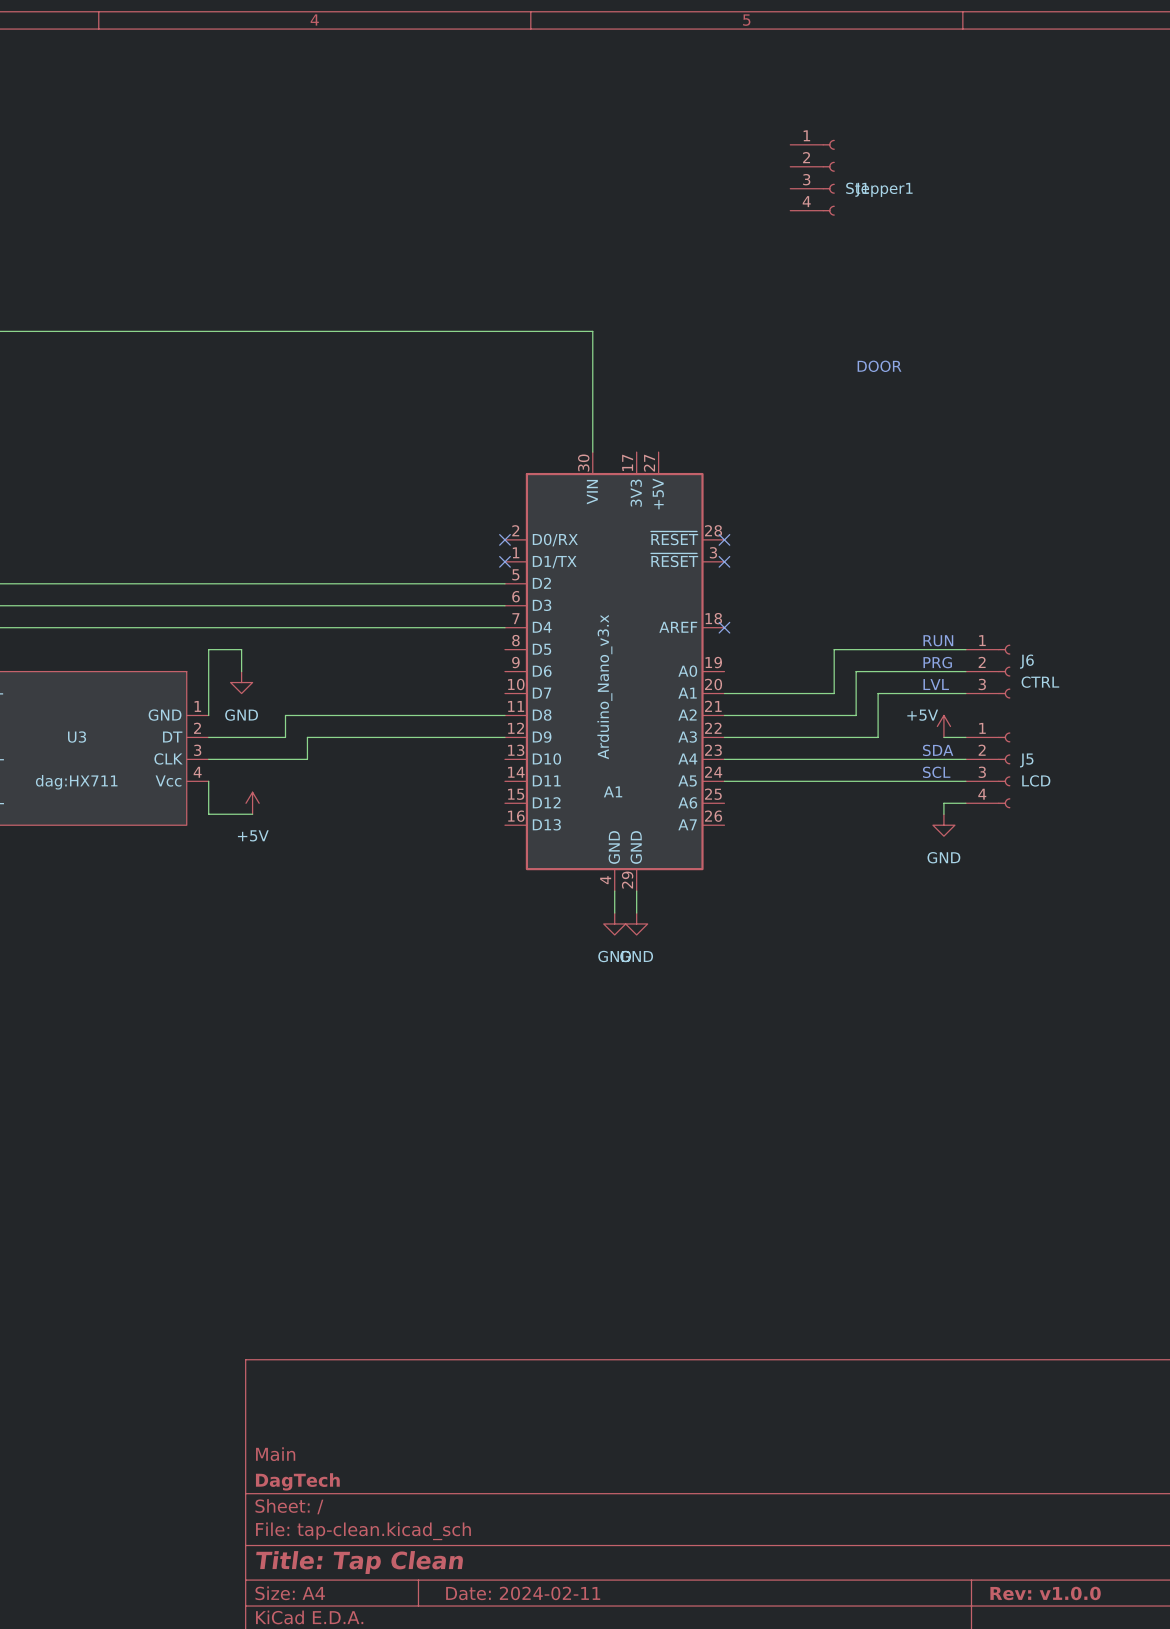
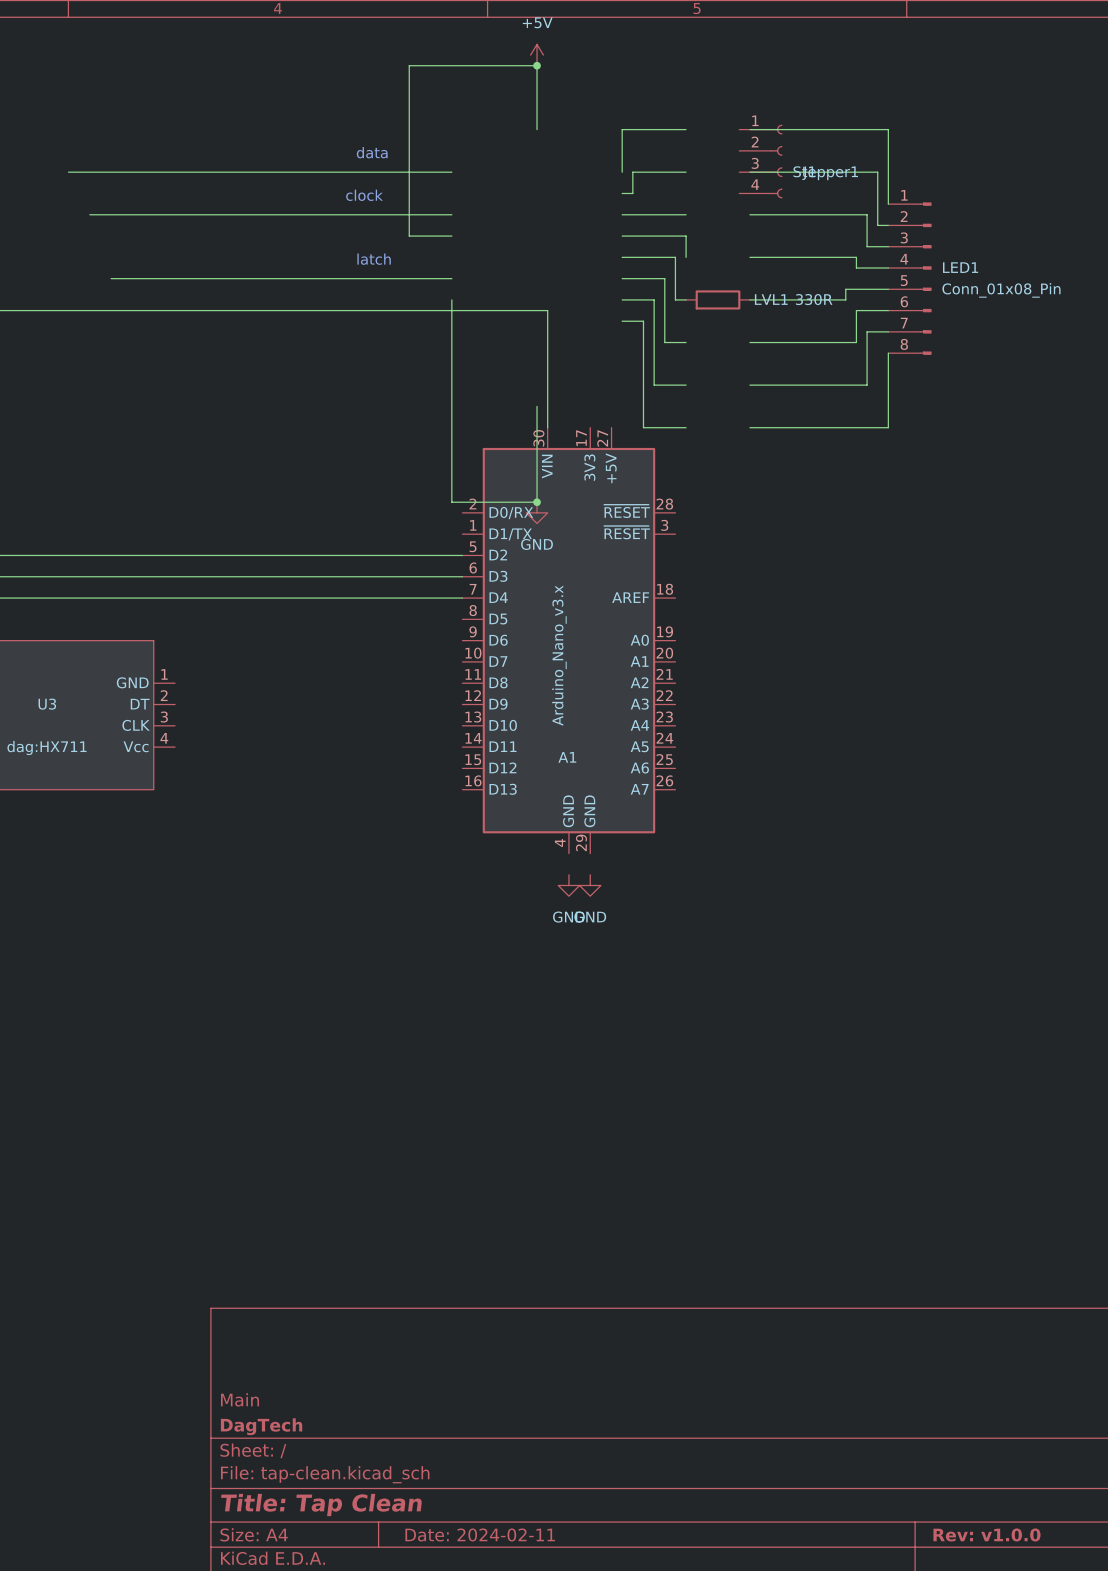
power symbol: none -> +5V (537, 55)
junction: none -> (537, 65)
wire: none -> (537, 129) (537, 65) (409, 65) (409, 236) (451, 236)
wire: none -> (686, 129) (622, 129) (622, 172)
wire: none -> (749, 129) (888, 129) (888, 204)
text: none -> data (372, 152)
wire: none -> (68, 172) (451, 172)
wire: none -> (686, 172) (632, 172) (632, 193) (622, 193)
wire: none -> (749, 172) (877, 172) (877, 225) (888, 225)
text: none -> clock (364, 195)
wire: none -> (89, 214) (451, 214)
wire: none -> (622, 214) (686, 214)
wire: none -> (749, 214) (867, 214) (867, 246) (888, 246)
wire: none -> (622, 236) (686, 236) (686, 257)
wire: none -> (622, 257) (675, 257) (675, 299) (686, 299)
wire: none -> (749, 257) (856, 257) (856, 268) (888, 268)
text: none -> latch (374, 259)
wire: none -> (111, 278) (451, 278)
wire: none -> (622, 278) (664, 278) (664, 342) (686, 342)
LED1: none -> Conn_01x08_Pin (909, 278)
wire: none -> (888, 289) (845, 289) (845, 299) (749, 299)
wire: none -> (451, 299) (451, 502) (537, 502) (537, 406)
wire: none -> (622, 299) (654, 299) (654, 385) (686, 385)
LVL1: none -> 330R (718, 299)
wire: none -> (888, 310) (856, 310) (856, 342) (749, 342)
wire: none -> (622, 321) (643, 321) (643, 427) (686, 427)
wire: none -> (888, 331) (867, 331) (867, 385) (749, 385)
text: DOOR (879, 366) -> none
wire: none -> (888, 353) (888, 427) (749, 427)
junction: none -> (537, 502)
no-connect mark: (504, 539) -> none
power symbol: none -> GND (537, 512)
no-connect mark: (724, 539) -> none
no-connect mark: (504, 561) -> none
no-connect mark: (724, 561) -> none
no-connect mark: (724, 627) -> none
text: RUN (938, 640) -> none
wire: (965, 649) (834, 649) (834, 693) (724, 693) -> none
text: PRG (937, 662) -> none
wire: (241, 671) (241, 649) (208, 649) (208, 715) -> none
wire: (965, 671) (856, 671) (856, 715) (724, 715) -> none
J6: CTRL (988, 671) -> none
power symbol: GND (241, 682) -> none
text: LVL (936, 684) -> none
wire: (965, 693) (878, 693) (878, 737) (724, 737) -> none
wire: (504, 715) (285, 715) (285, 737) (208, 737) -> none
power symbol: +5V (943, 726) -> none
wire: (504, 737) (307, 737) (307, 759) (208, 759) -> none
wire: (943, 737) (965, 737) -> none
text: SDA (938, 750) -> none
wire: (724, 759) (965, 759) -> none
J5: LCD (988, 770) -> none
text: SCL (936, 772) -> none
wire: (208, 781) (208, 814) (252, 814) -> none
wire: (724, 781) (965, 781) -> none
power symbol: +5V (252, 803) -> none
wire: (965, 803) (943, 803) (943, 814) -> none
power symbol: GND (943, 825) -> none
wire: (614, 891) (614, 913) -> none
wire: (636, 891) (636, 913) -> none

